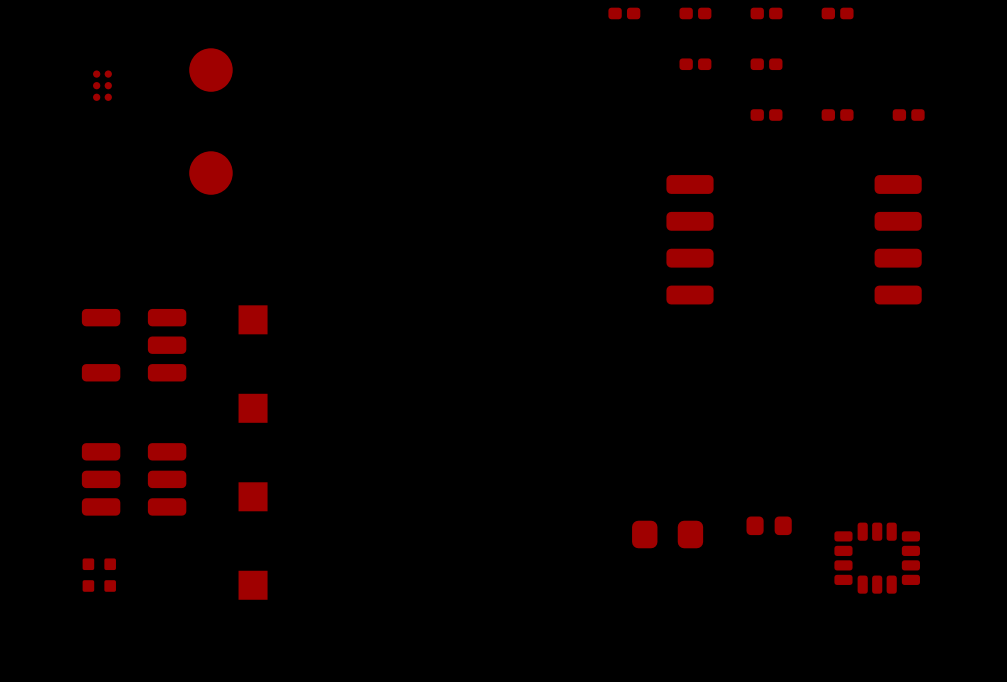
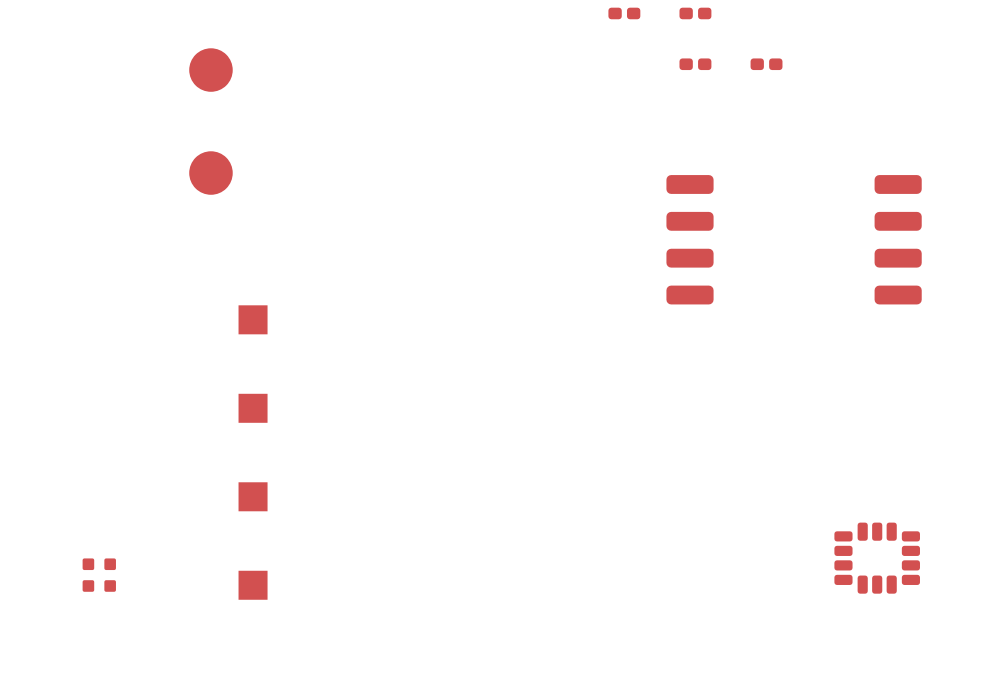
part: (766, 13) -> none
part: (837, 13) -> none
part: (102, 85) -> none
part: (766, 115) -> none
part: (837, 115) -> none
part: (908, 115) -> none
part: (134, 345) -> none
part: (134, 479) -> none
part: (769, 525) -> none
part: (667, 534) -> none

